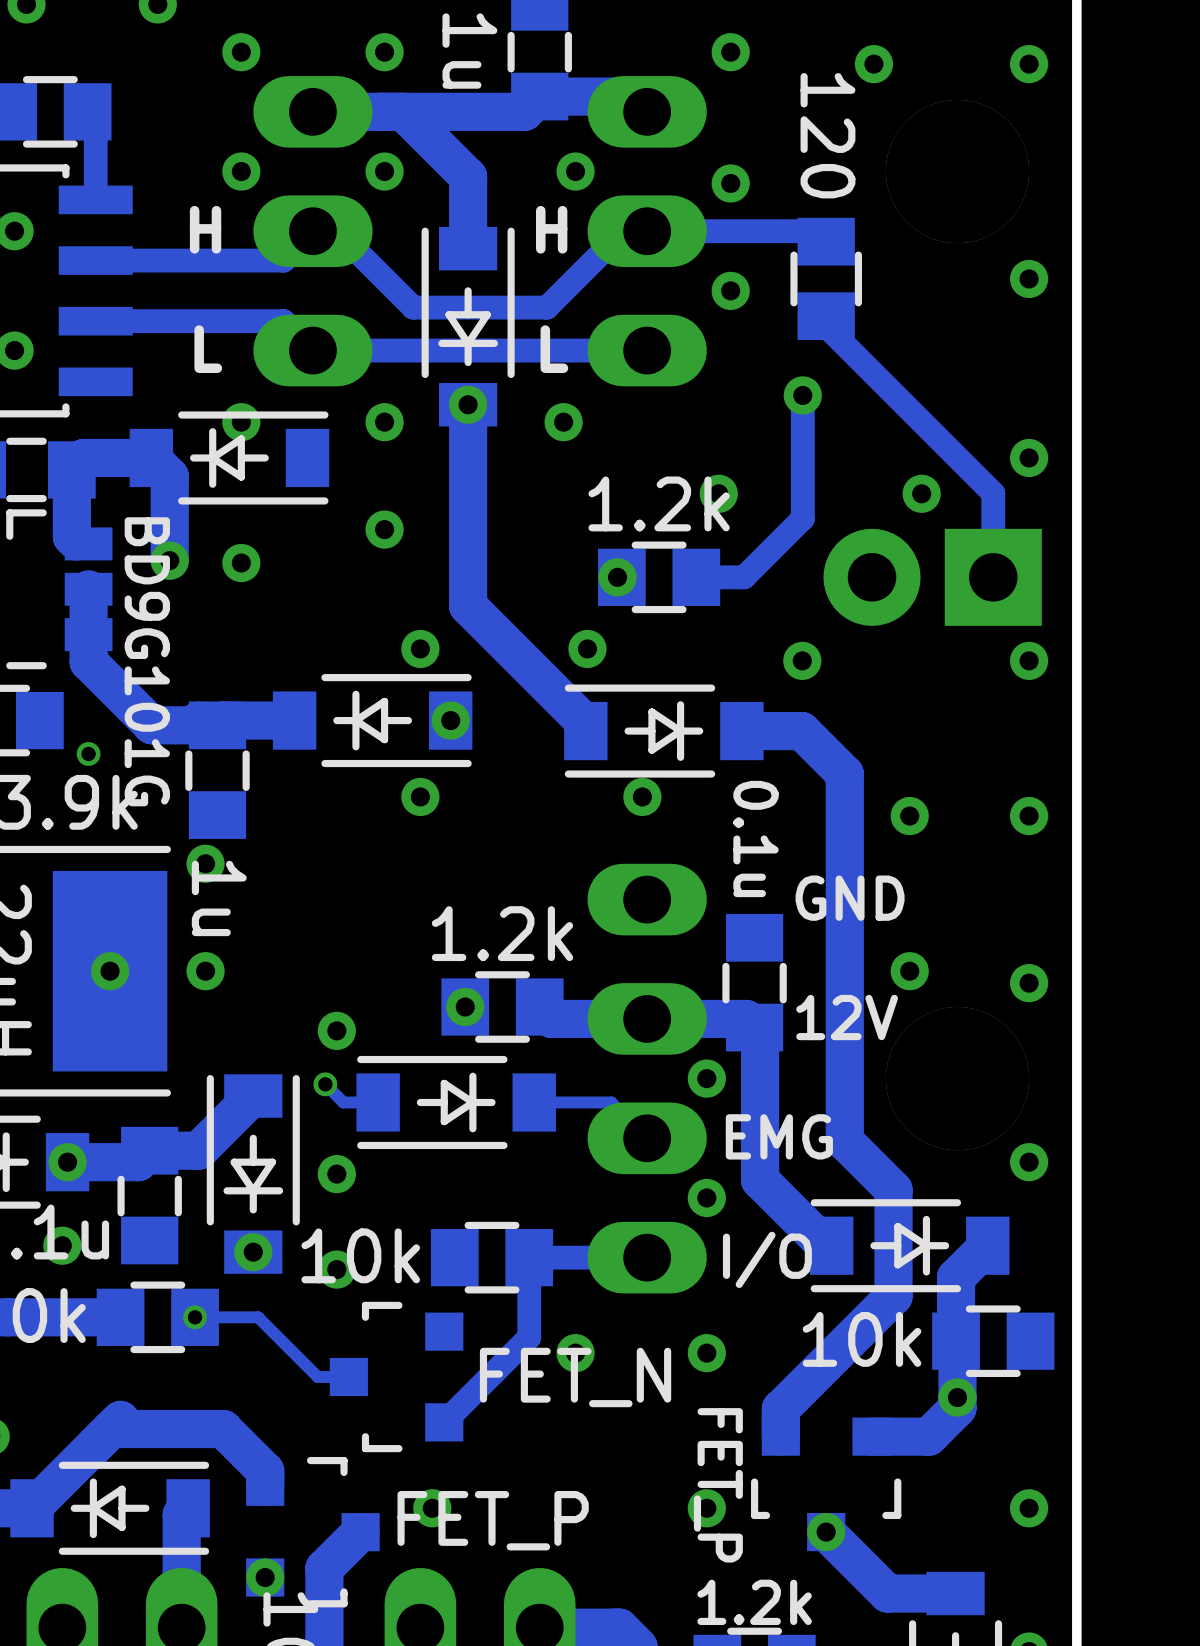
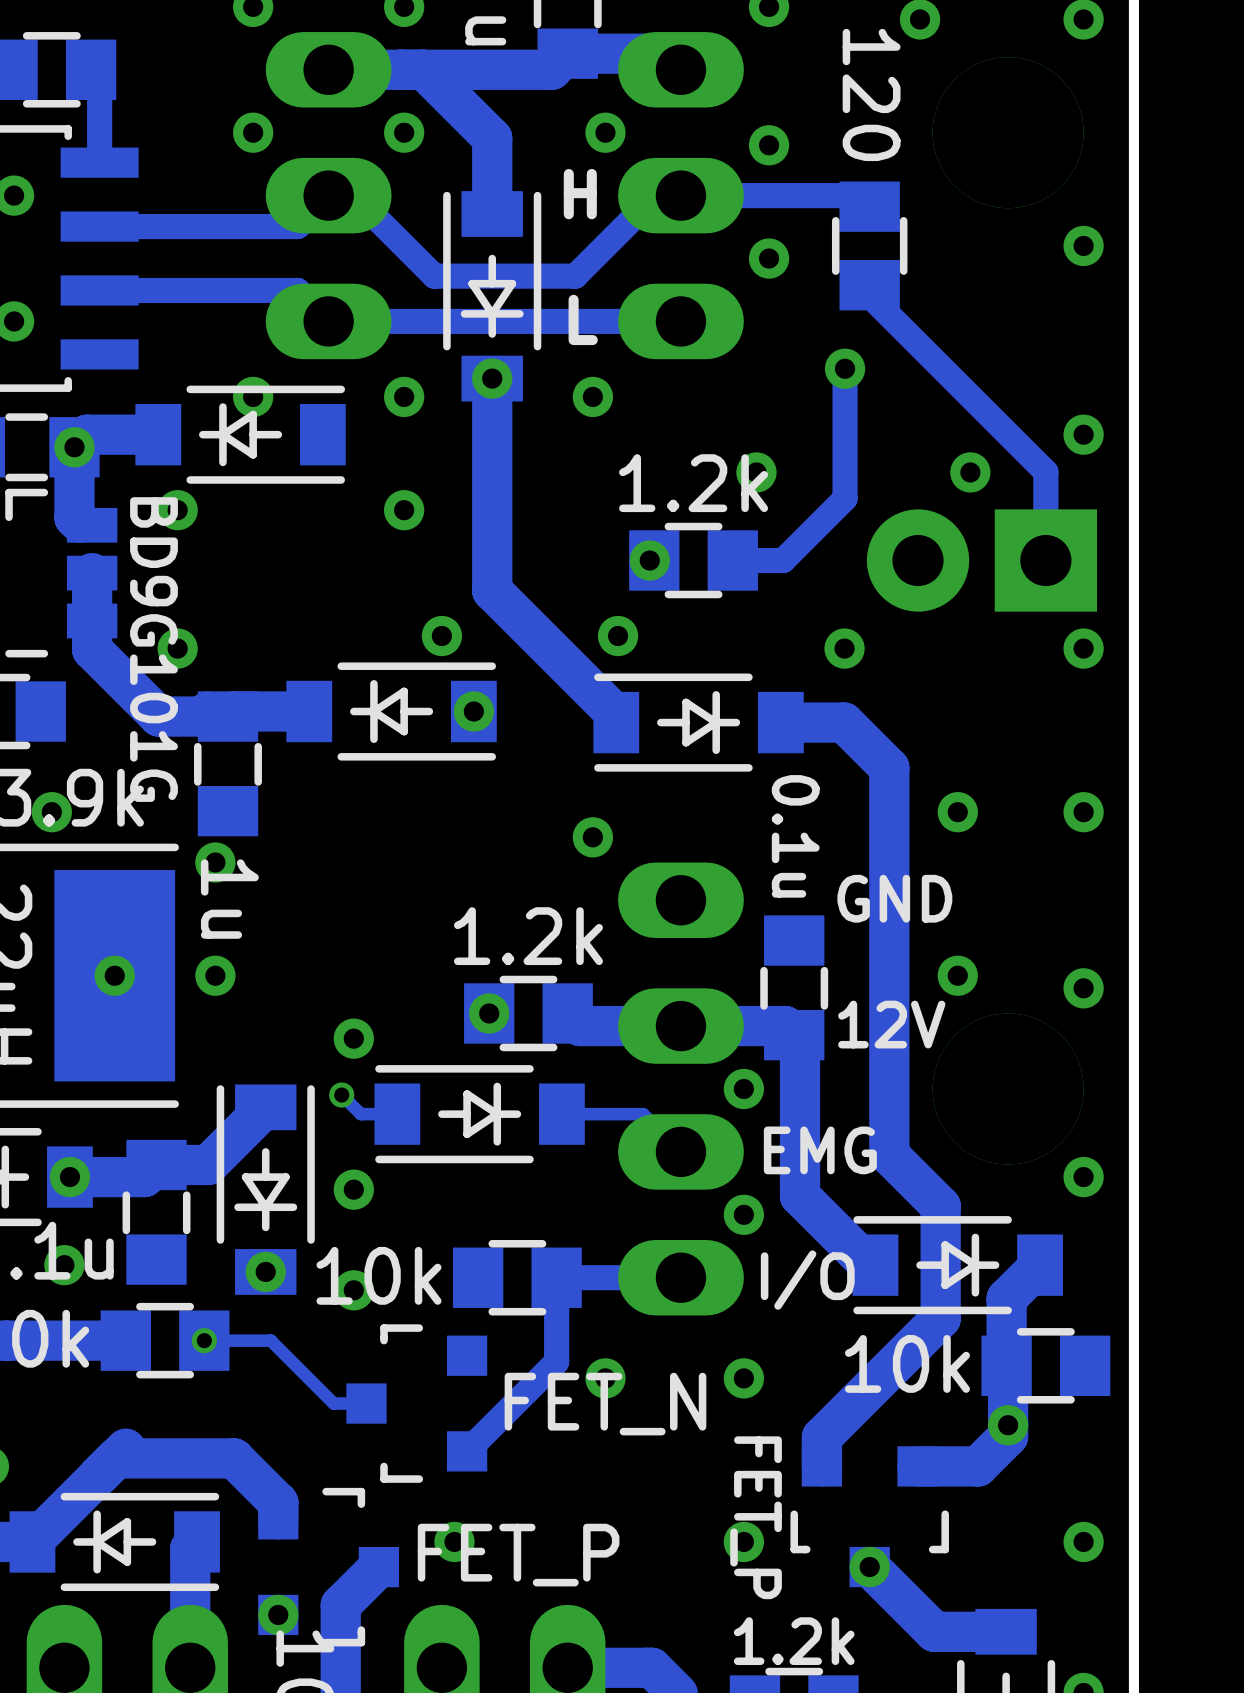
text: H (205, 229) -> none
text: L (208, 349) -> none
track: (151, 457) (169, 476) (169, 560) -> none
via: none -> (74, 447)
via position: (169, 560) -> (177, 510)
via: (241, 563) -> none
via: none -> (177, 648)
via: (88, 753) -> none
via: (420, 796) -> none
via: (642, 796) -> none
via: none -> (51, 812)
via: none -> (592, 837)

